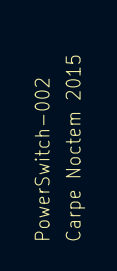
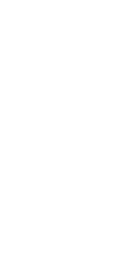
text: Carpe Noctem 2015 (75, 148) -> none
text: PowerSwitch-002 (42, 159) -> none

